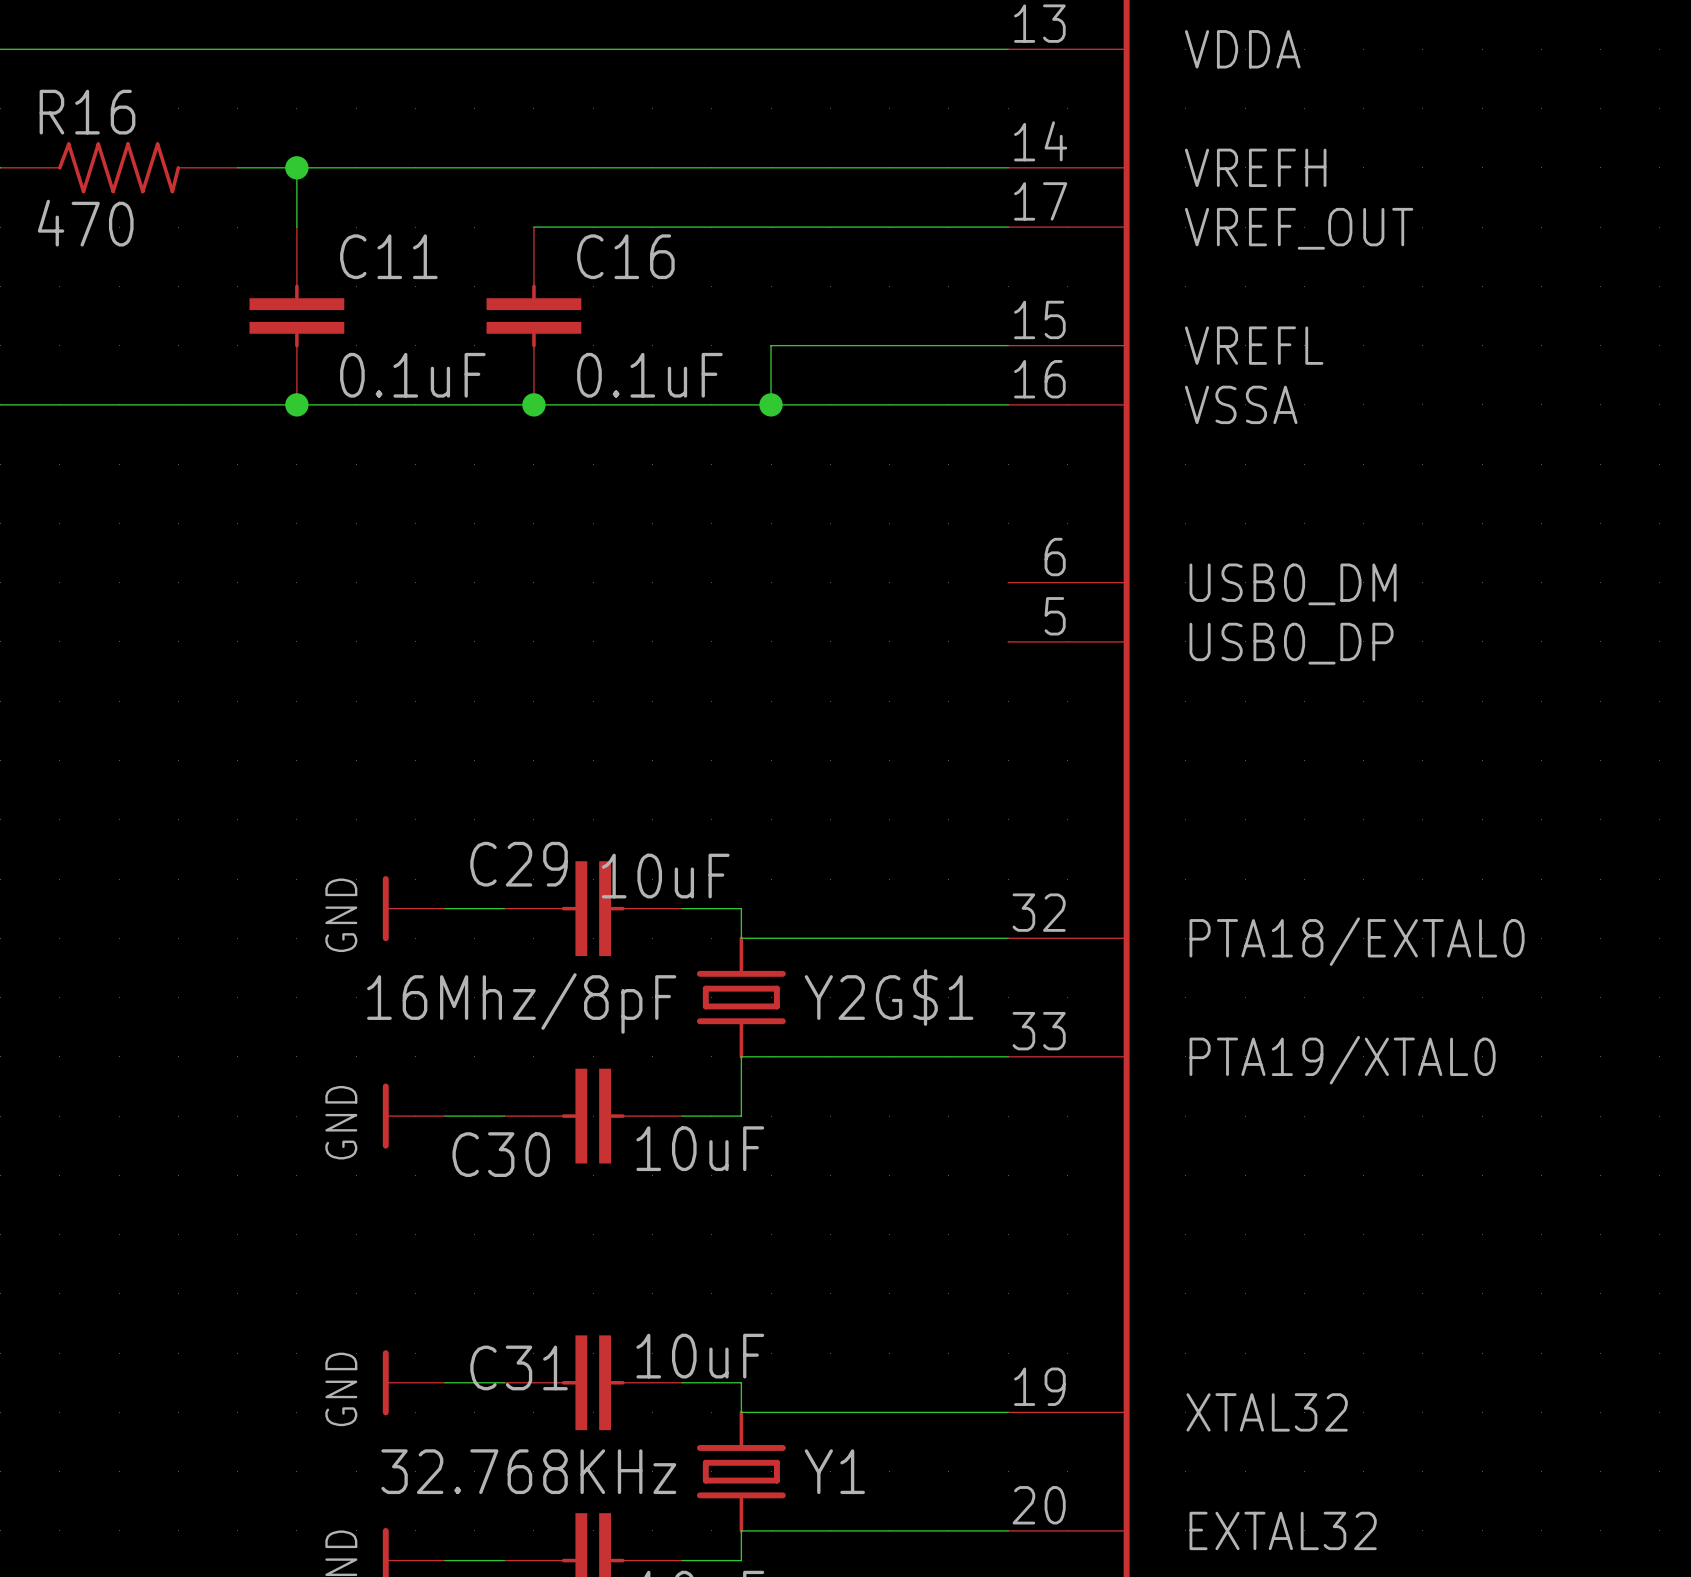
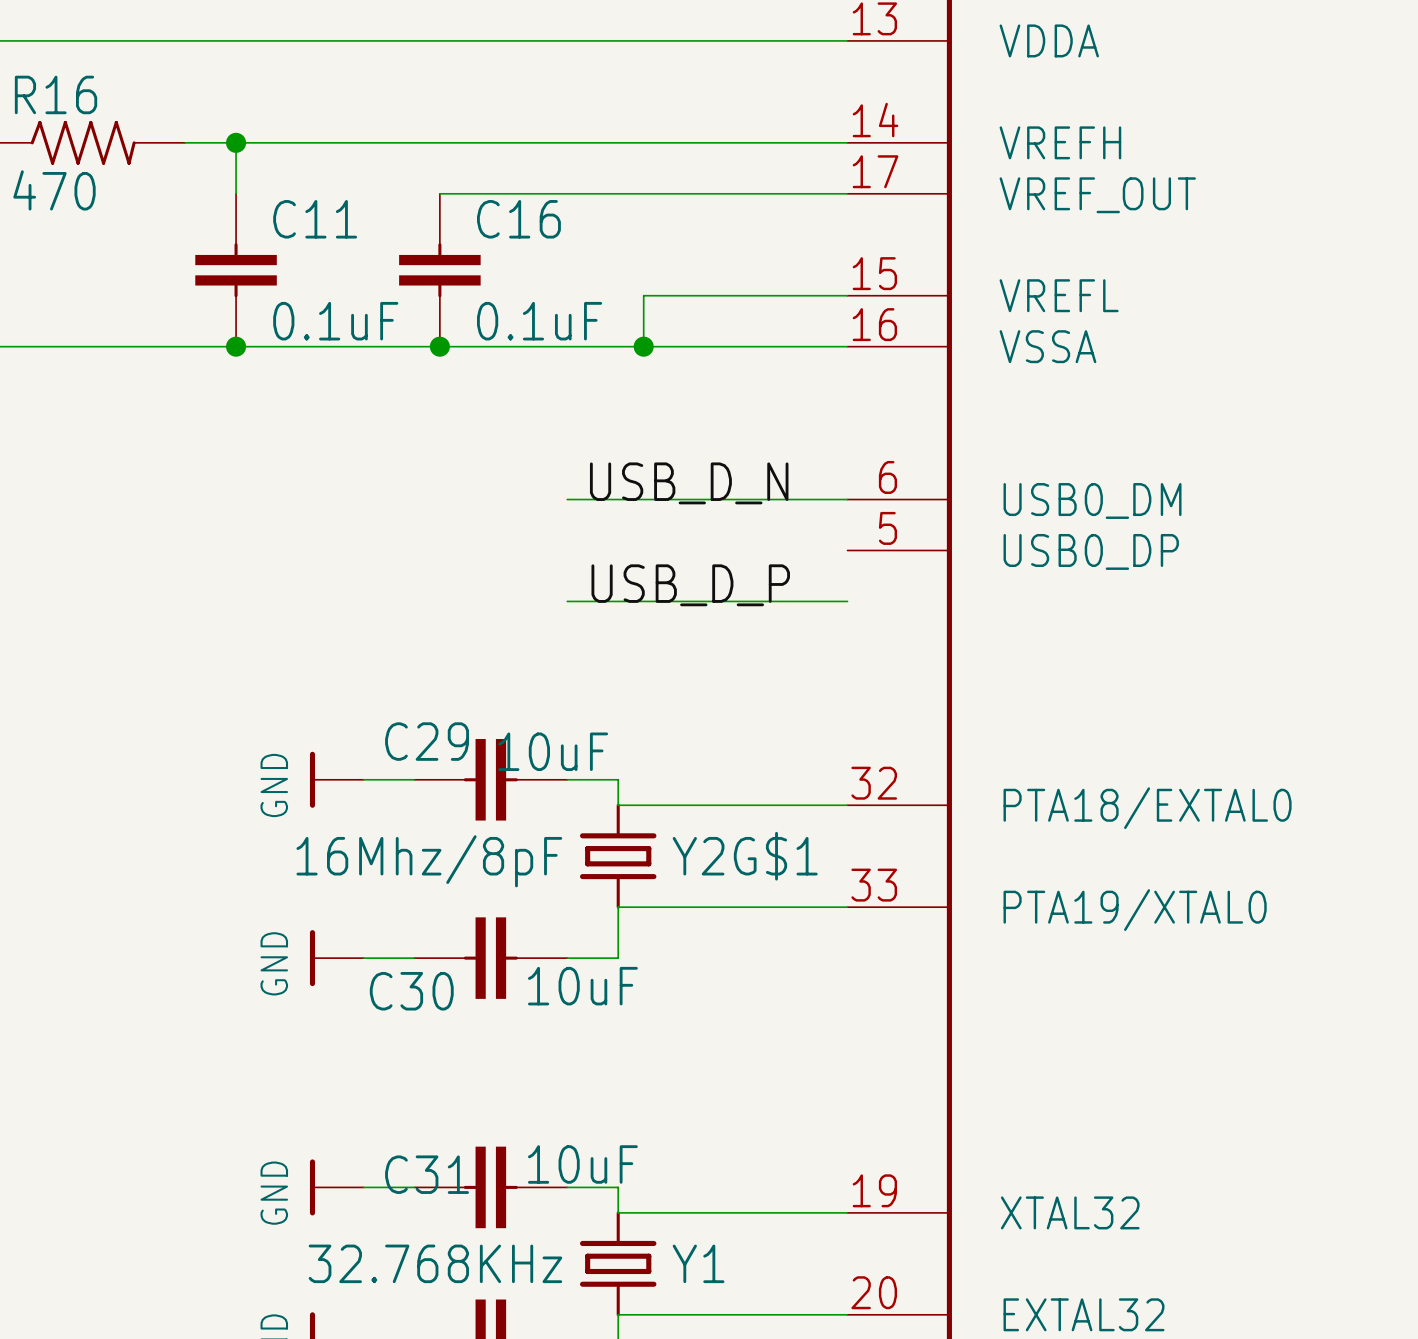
label: none -> USB_D_N (689, 483)
wire: none -> (567, 499) (847, 499)
label: none -> USB_D_P (690, 585)
wire: none -> (567, 601) (847, 601)

